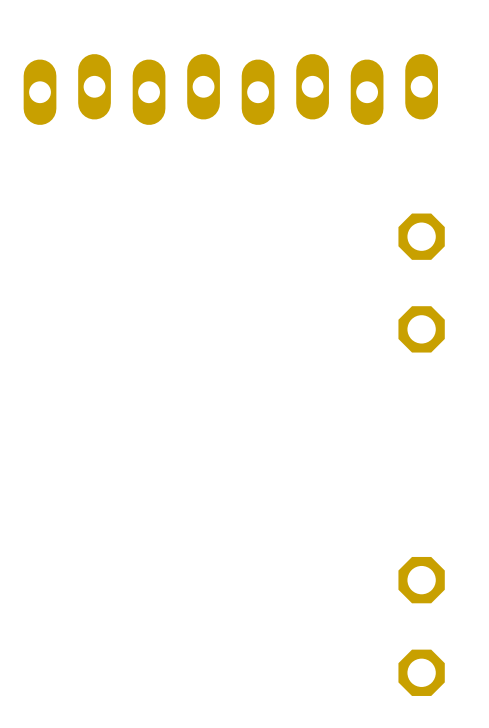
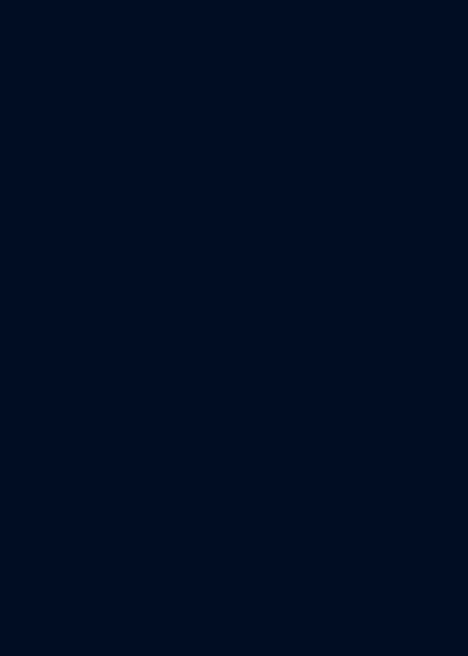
part: (230, 89) -> none
part: (421, 236) -> none
part: (421, 329) -> none
part: (421, 580) -> none
part: (421, 672) -> none

